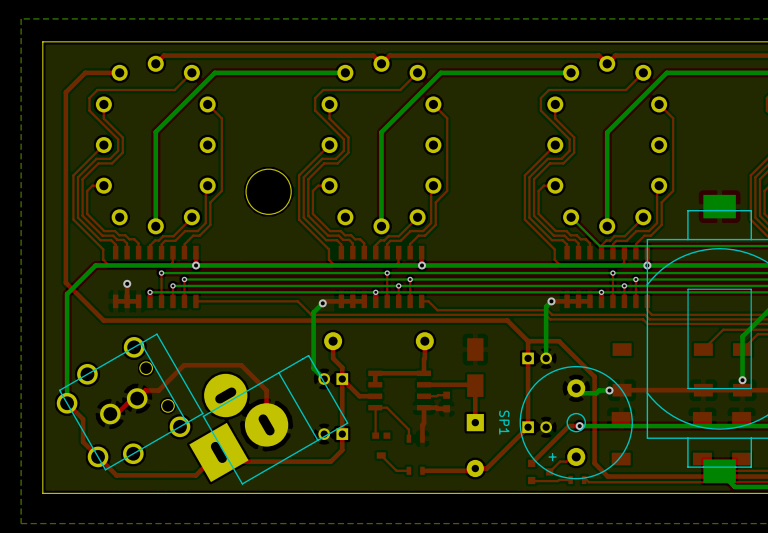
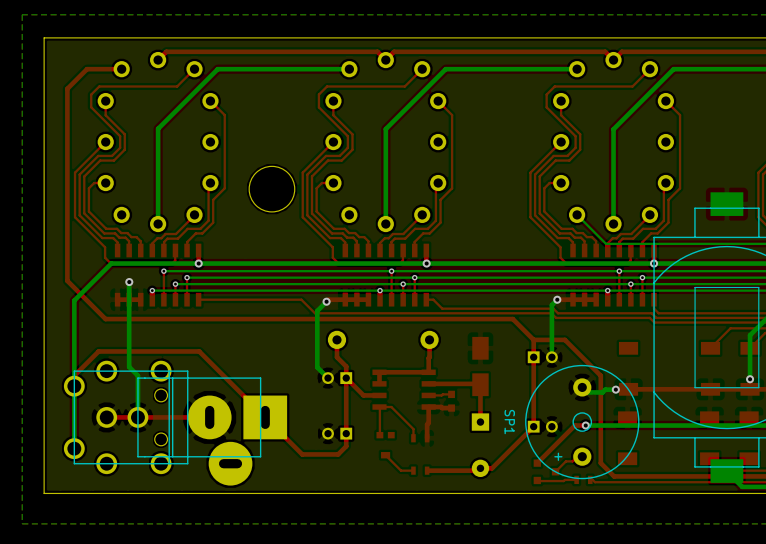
bottom track: (109, 265) (95, 265) (67, 294) (67, 403) -> (111, 263) (74, 300) (74, 448)
bottom track: none -> (129, 282) (129, 366) (137, 375) (137, 417)
part: (130, 401) -> none
top track: (67, 403) (83, 419) (83, 441) (116, 475) (195, 475) (218, 452) (228, 461) (330, 461) (342, 450) (342, 446) -> (80, 391) (74, 386) (74, 375) (98, 351) (199, 351) (302, 454) (338, 454) (346, 446)
top track: (110, 414) (116, 414) (132, 398) (137, 398) (145, 390) (158, 390) (183, 365) (241, 365) (266, 390) (266, 424) -> none
part: none -> (126, 417)
top track: none -> (209, 417) (106, 417)
part: (268, 419) -> none
part: none -> (212, 431)

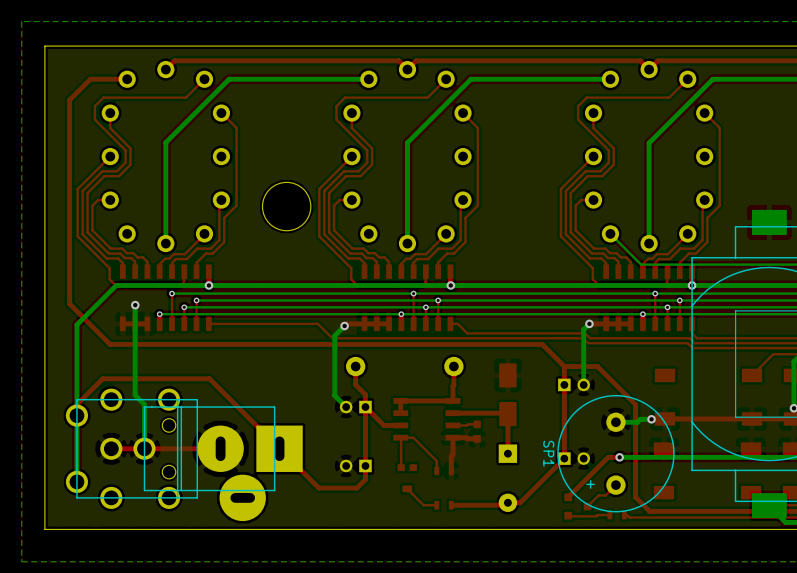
SP1 footprint: [525, 364, 640, 480] -> [557, 394, 675, 513]

